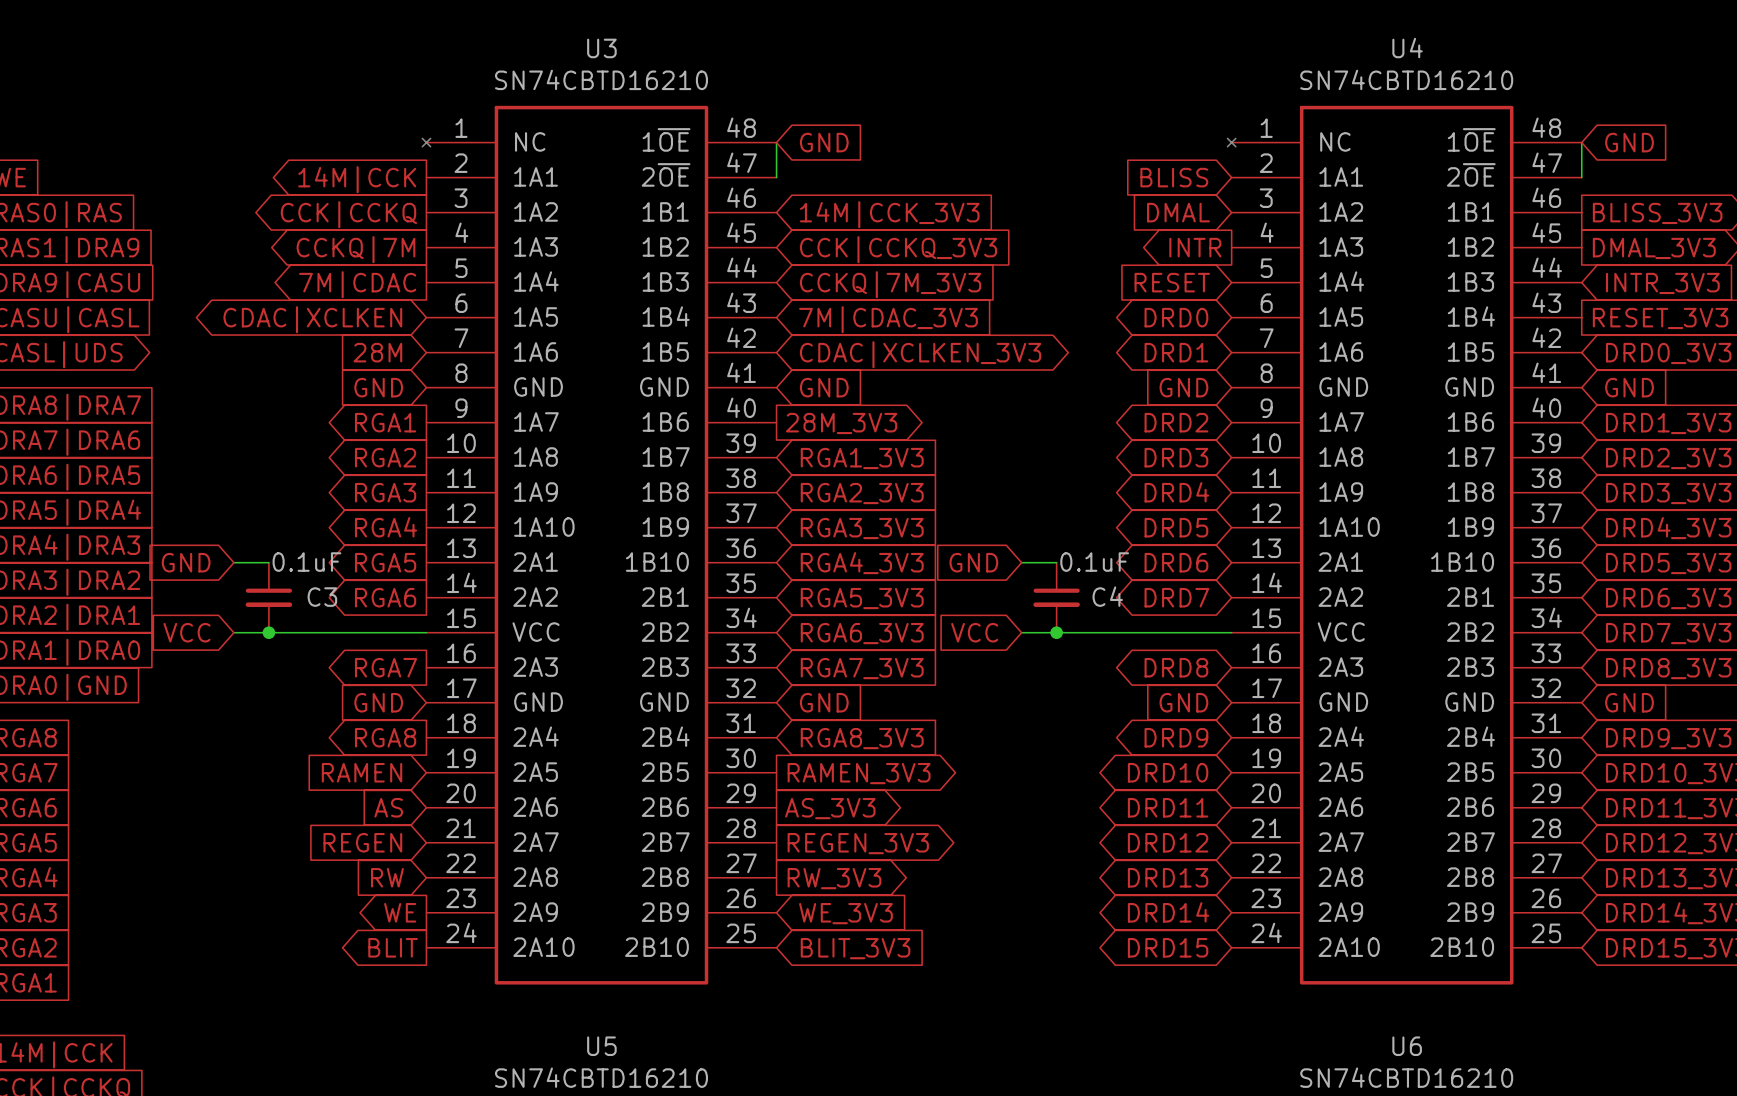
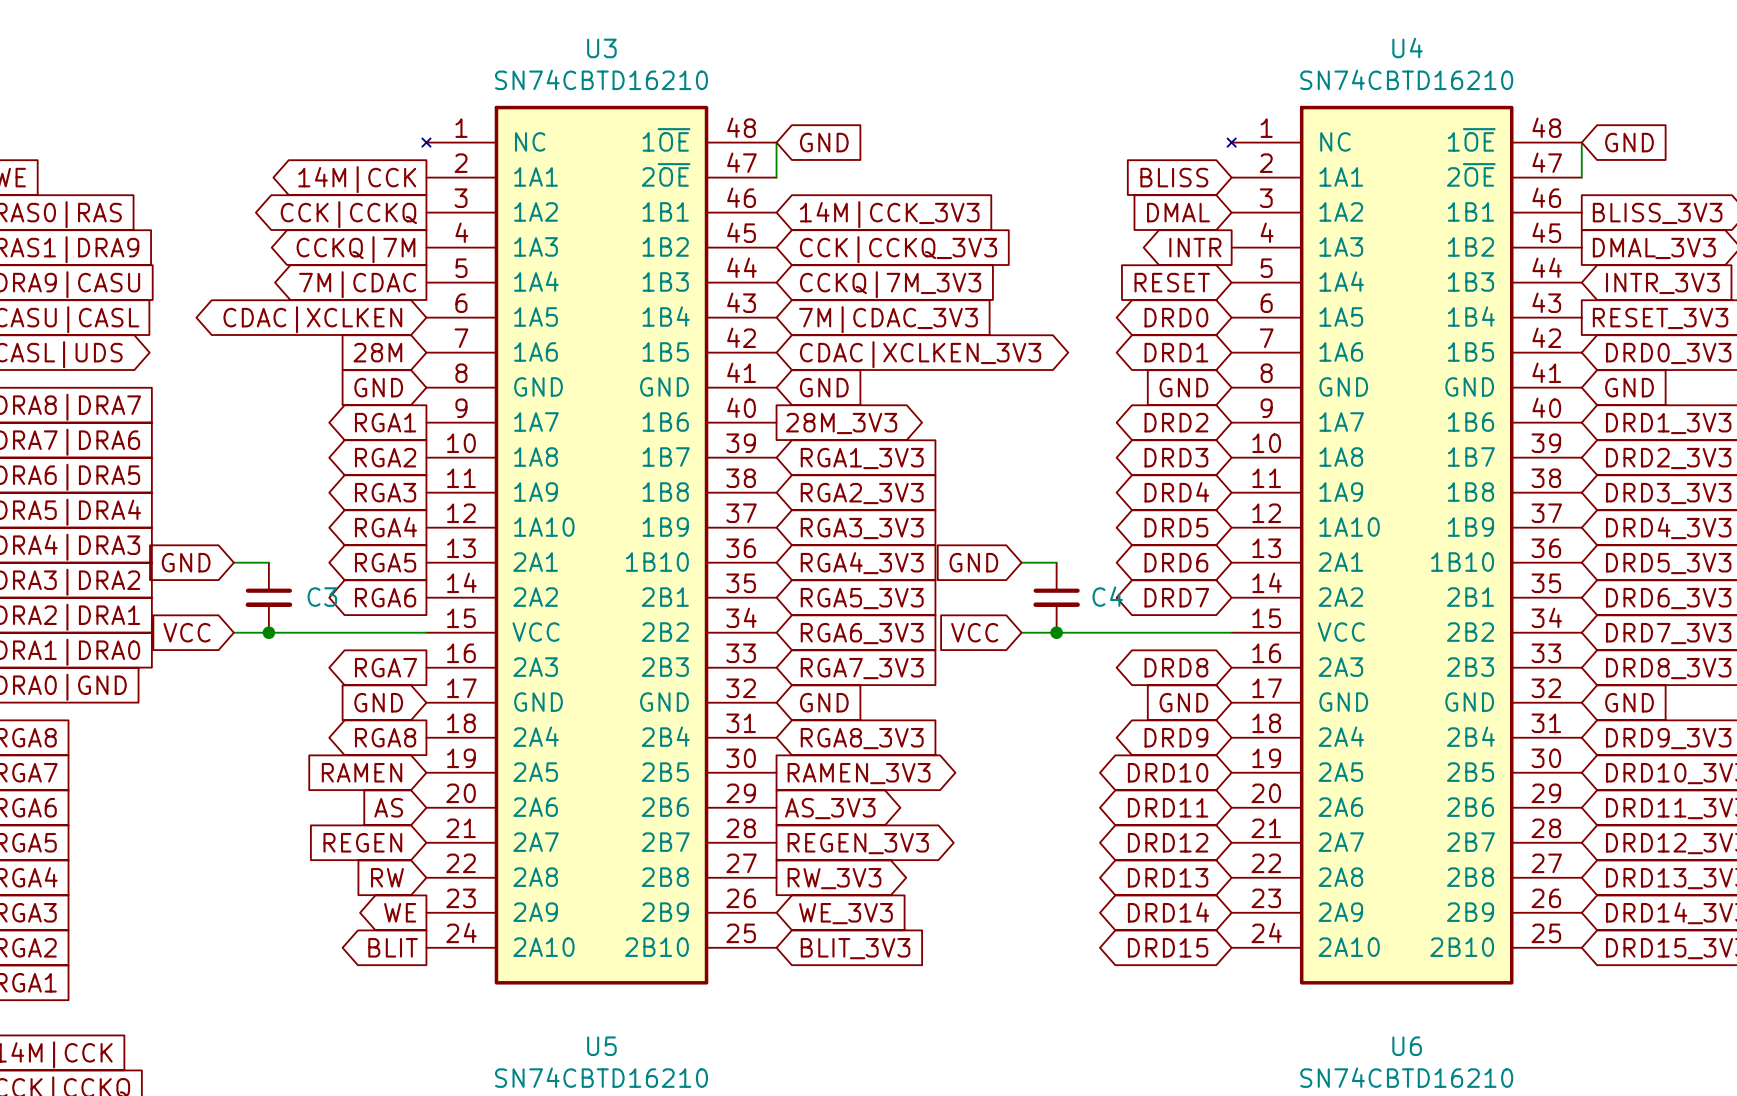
C3 value: 0.1uF (306, 562) -> none
C4 value: 0.1uF (1094, 562) -> none

